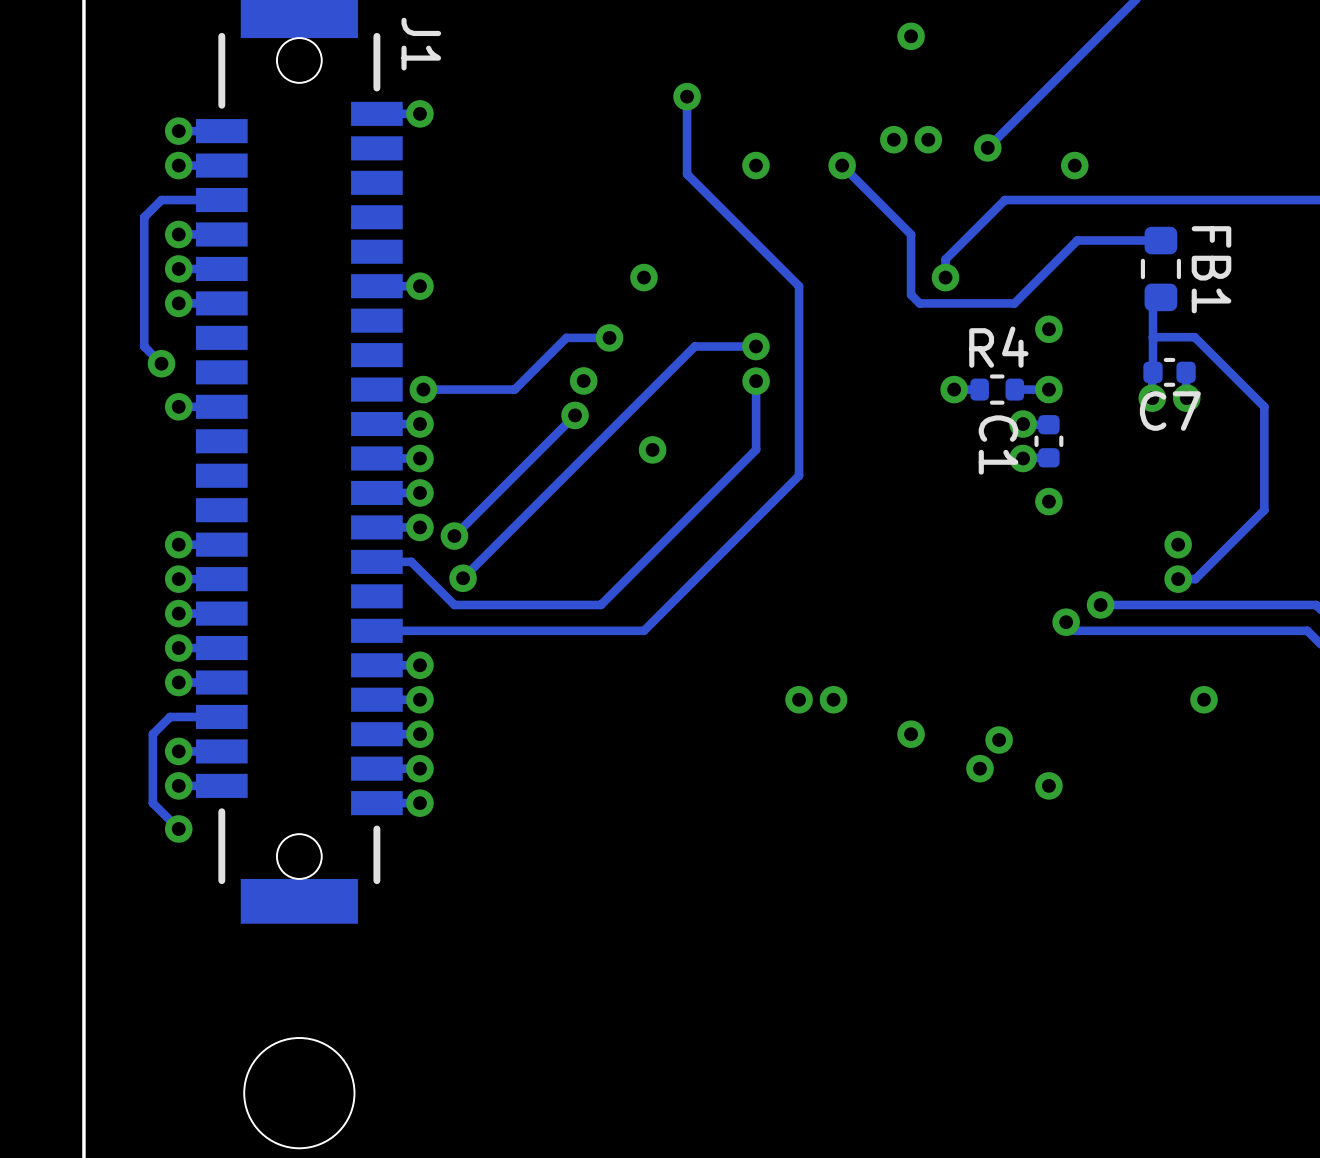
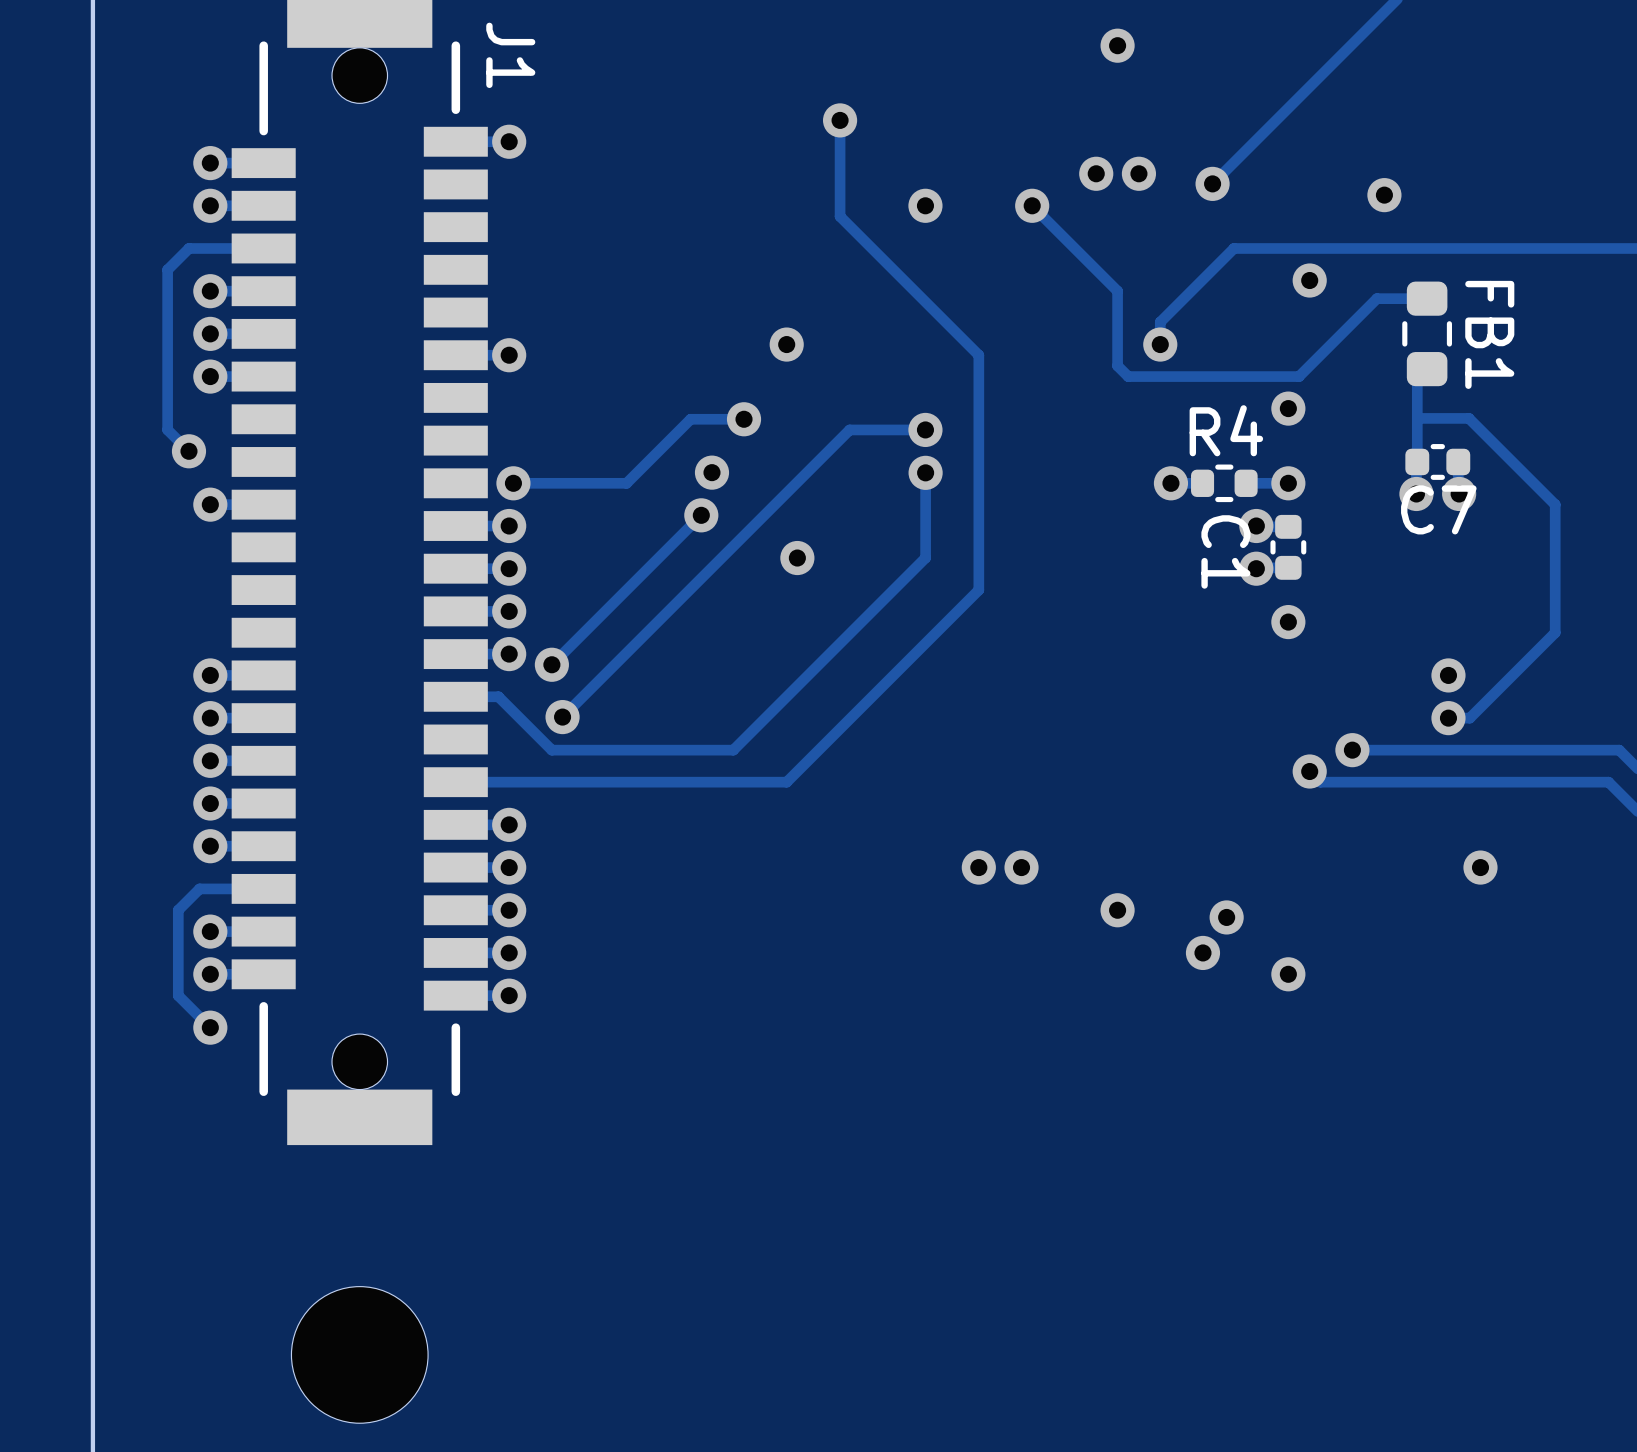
via: none -> (1384, 195)
via: (1074, 165) -> none
via: none -> (1309, 280)
track: (1120, 240) (1077, 240) (1014, 303) -> (1376, 298) (1299, 376) (1245, 376)

